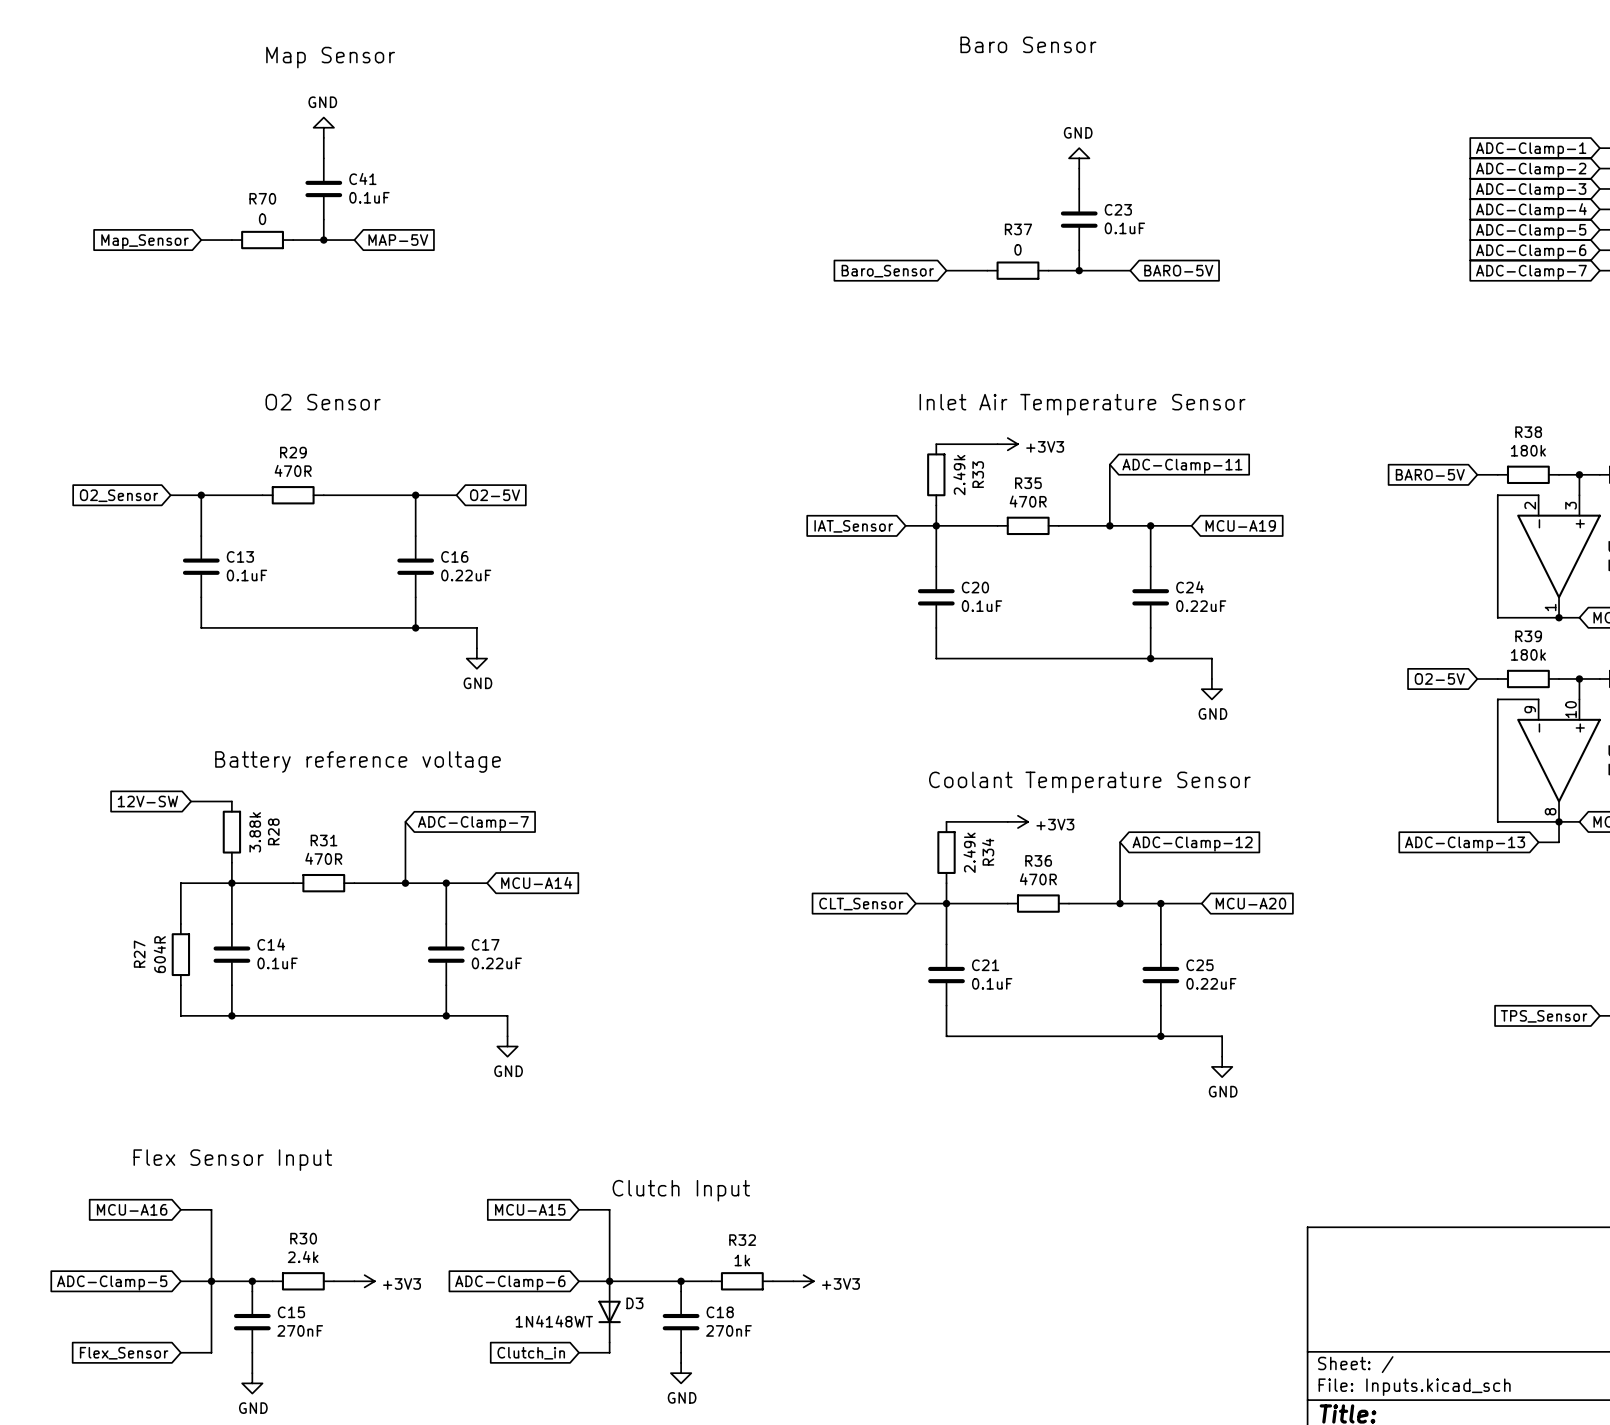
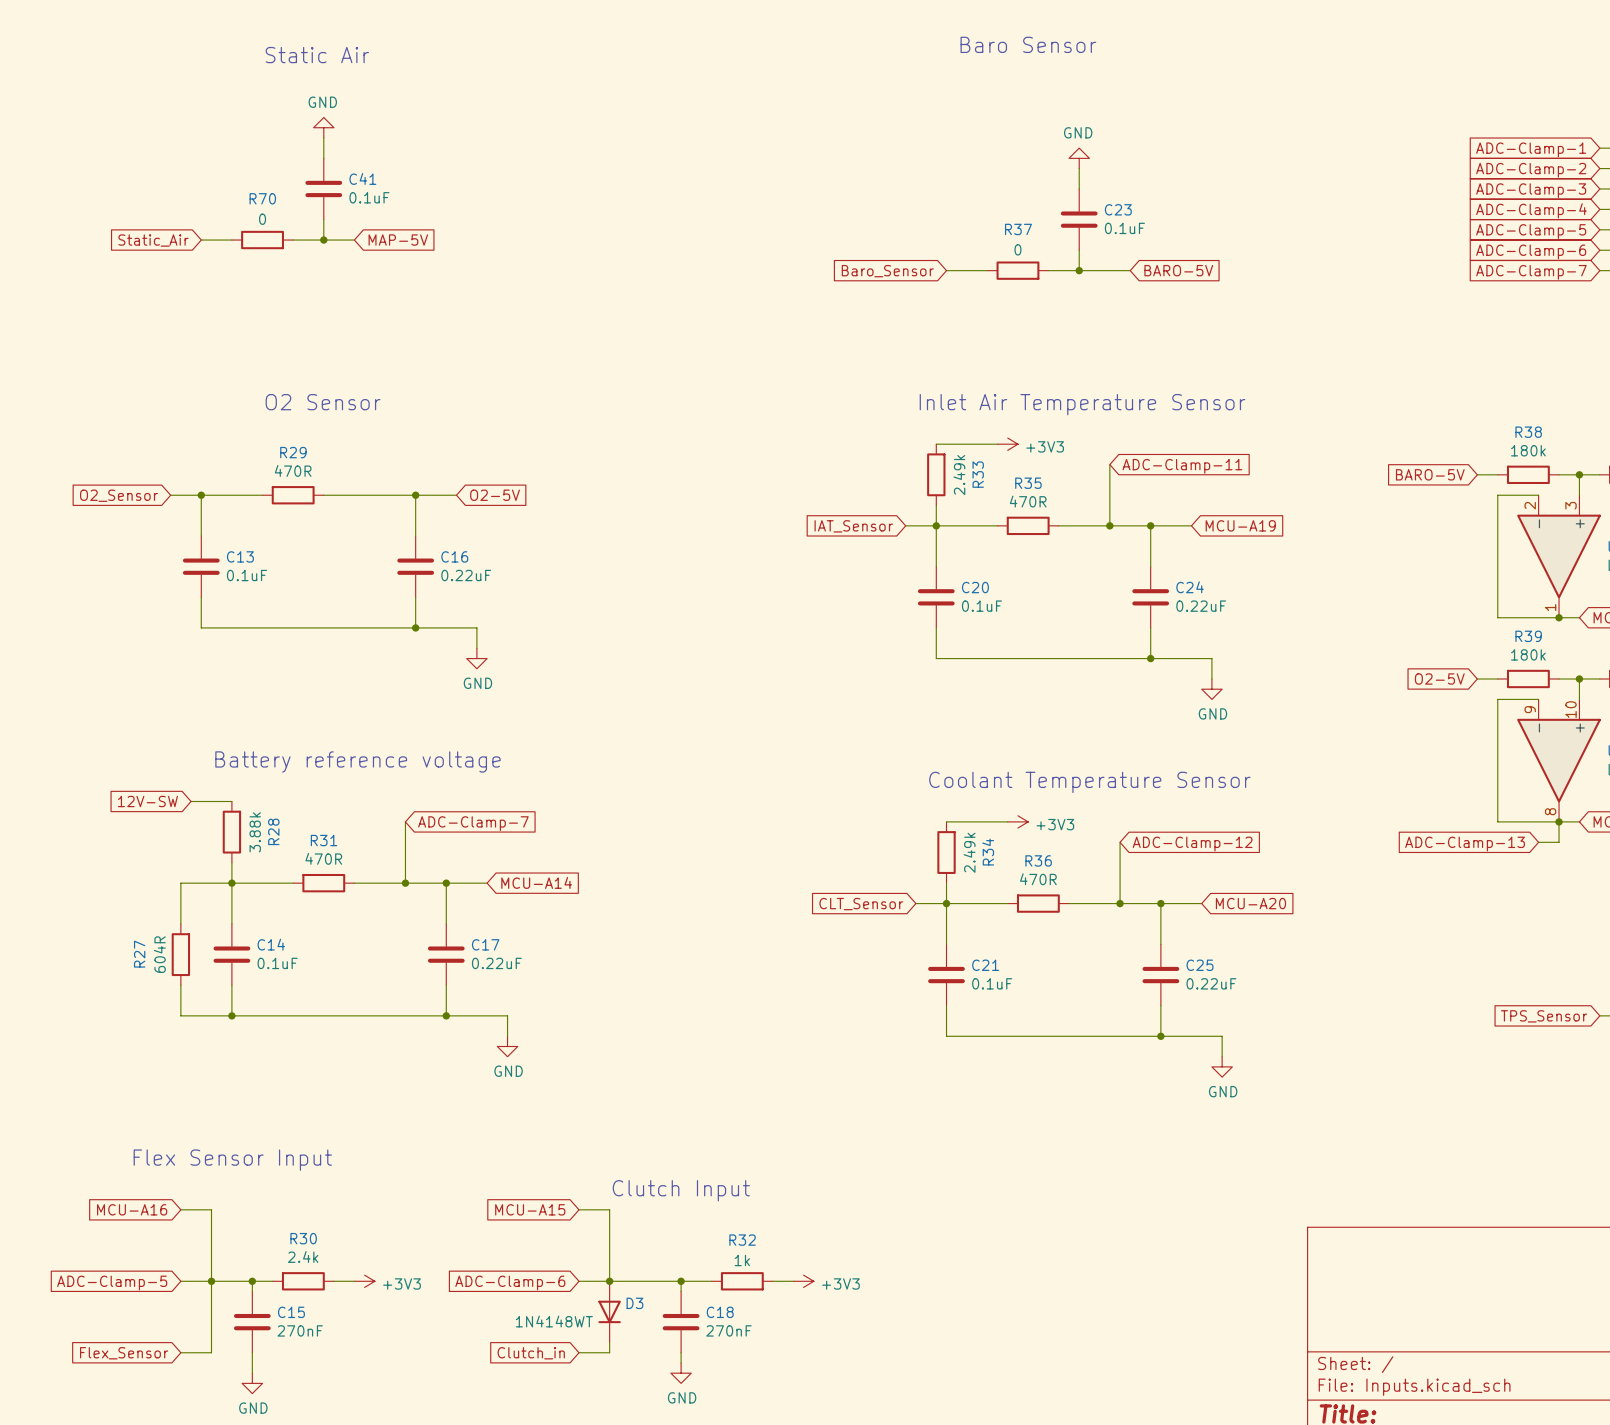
text: Map Sensor (330, 57) -> Static Air (317, 55)
global label: Map_Sensor (145, 241) -> Static_Air (153, 240)

